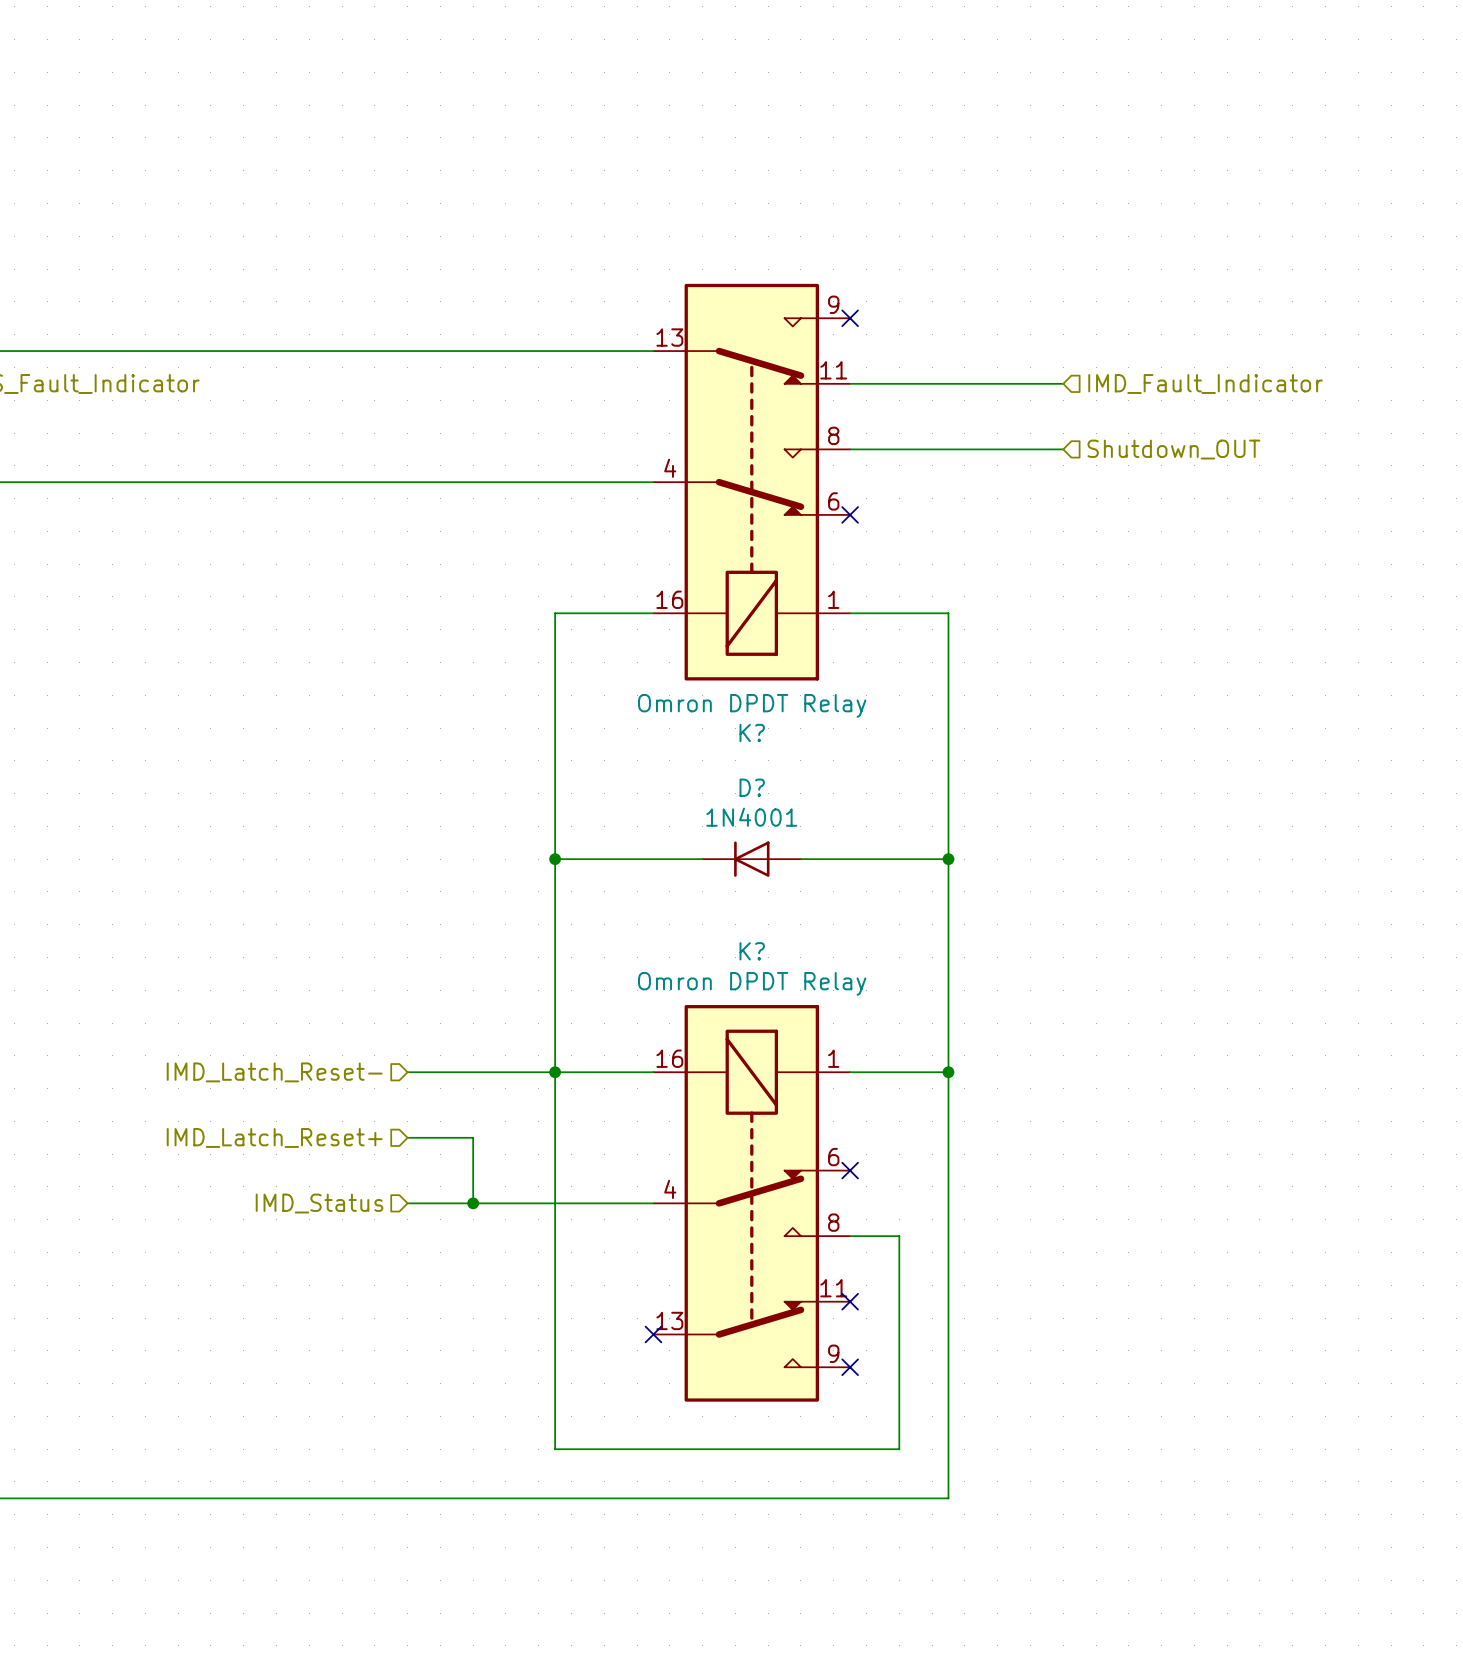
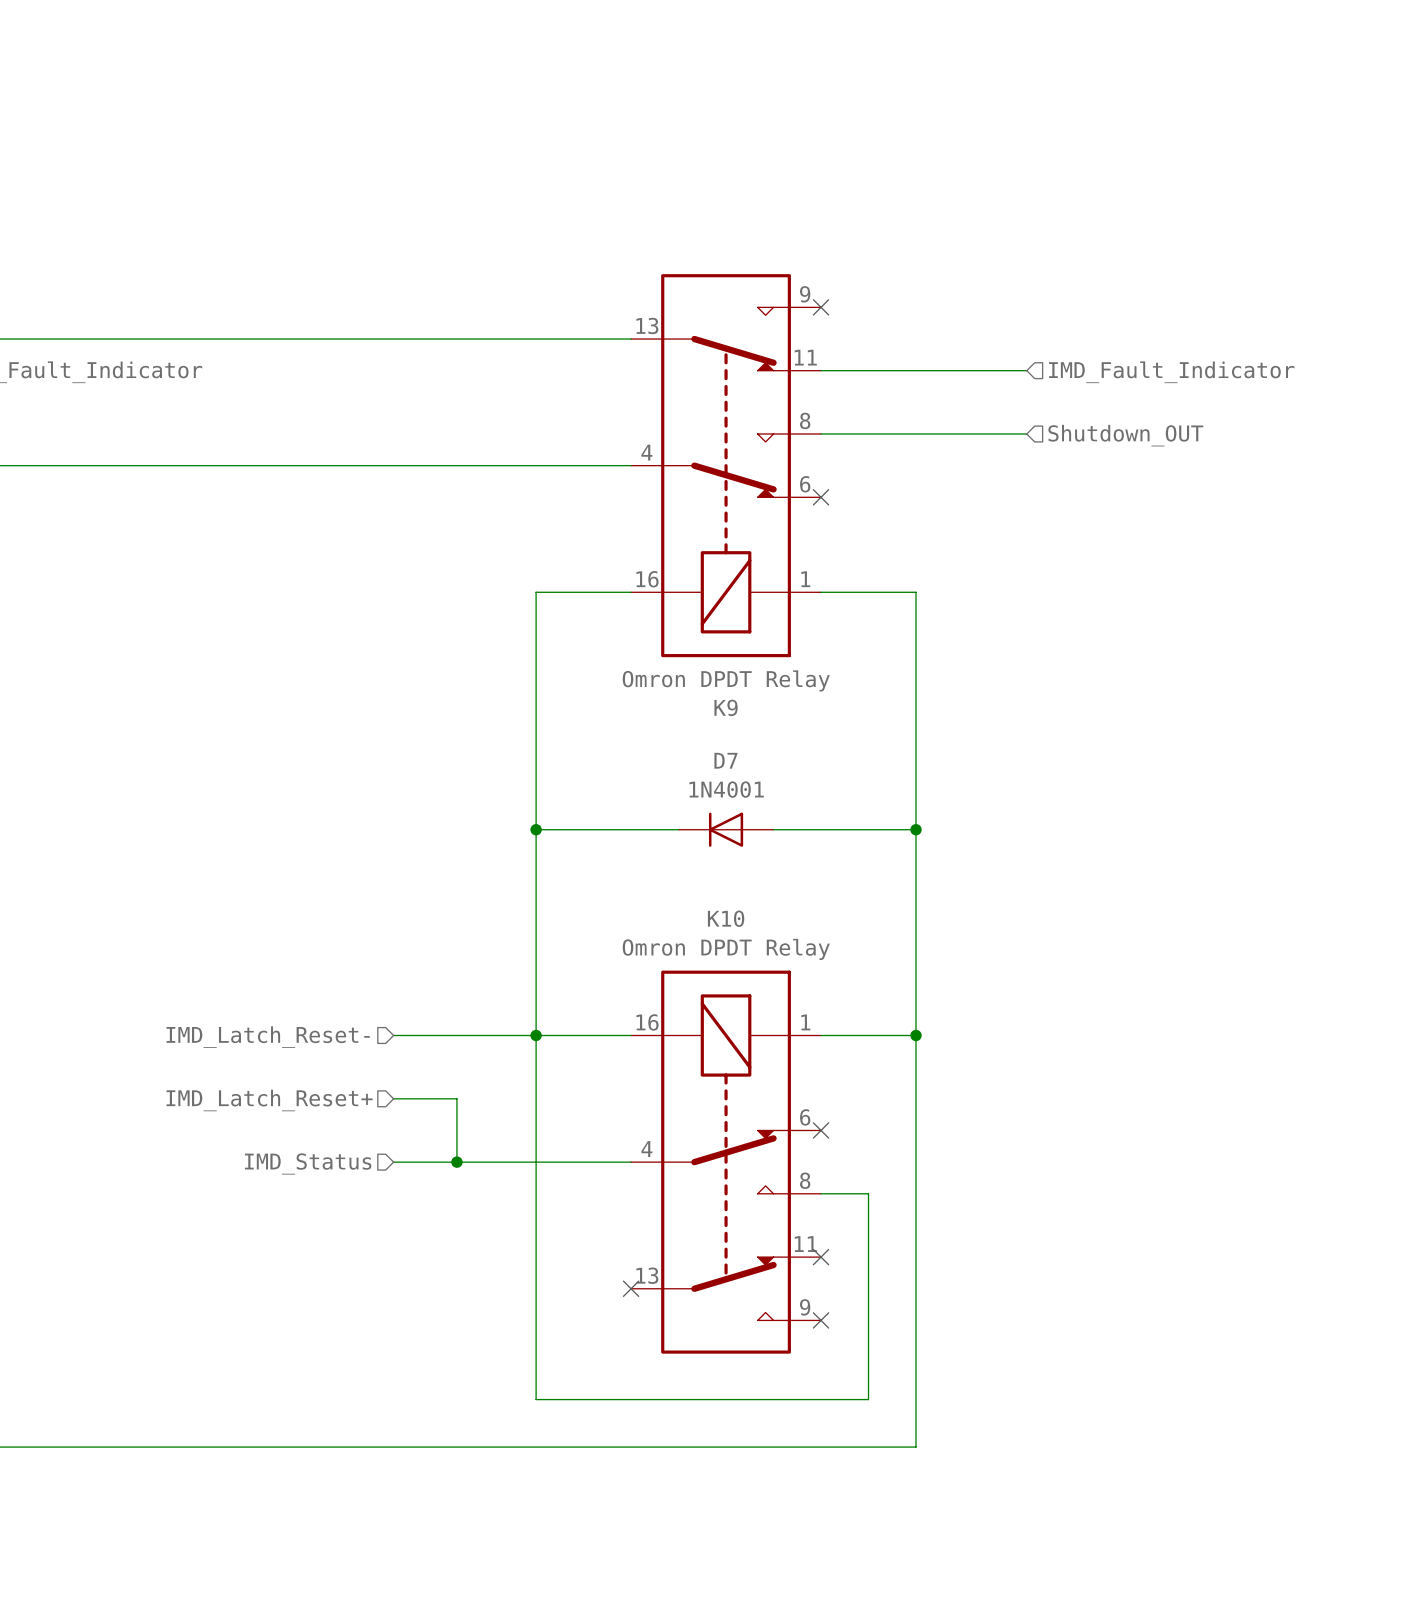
K? name: K? (752, 732) -> K9 (726, 707)
D? name: D? (752, 787) -> D7 (725, 760)
K? name: K? (752, 951) -> K10 (726, 918)

